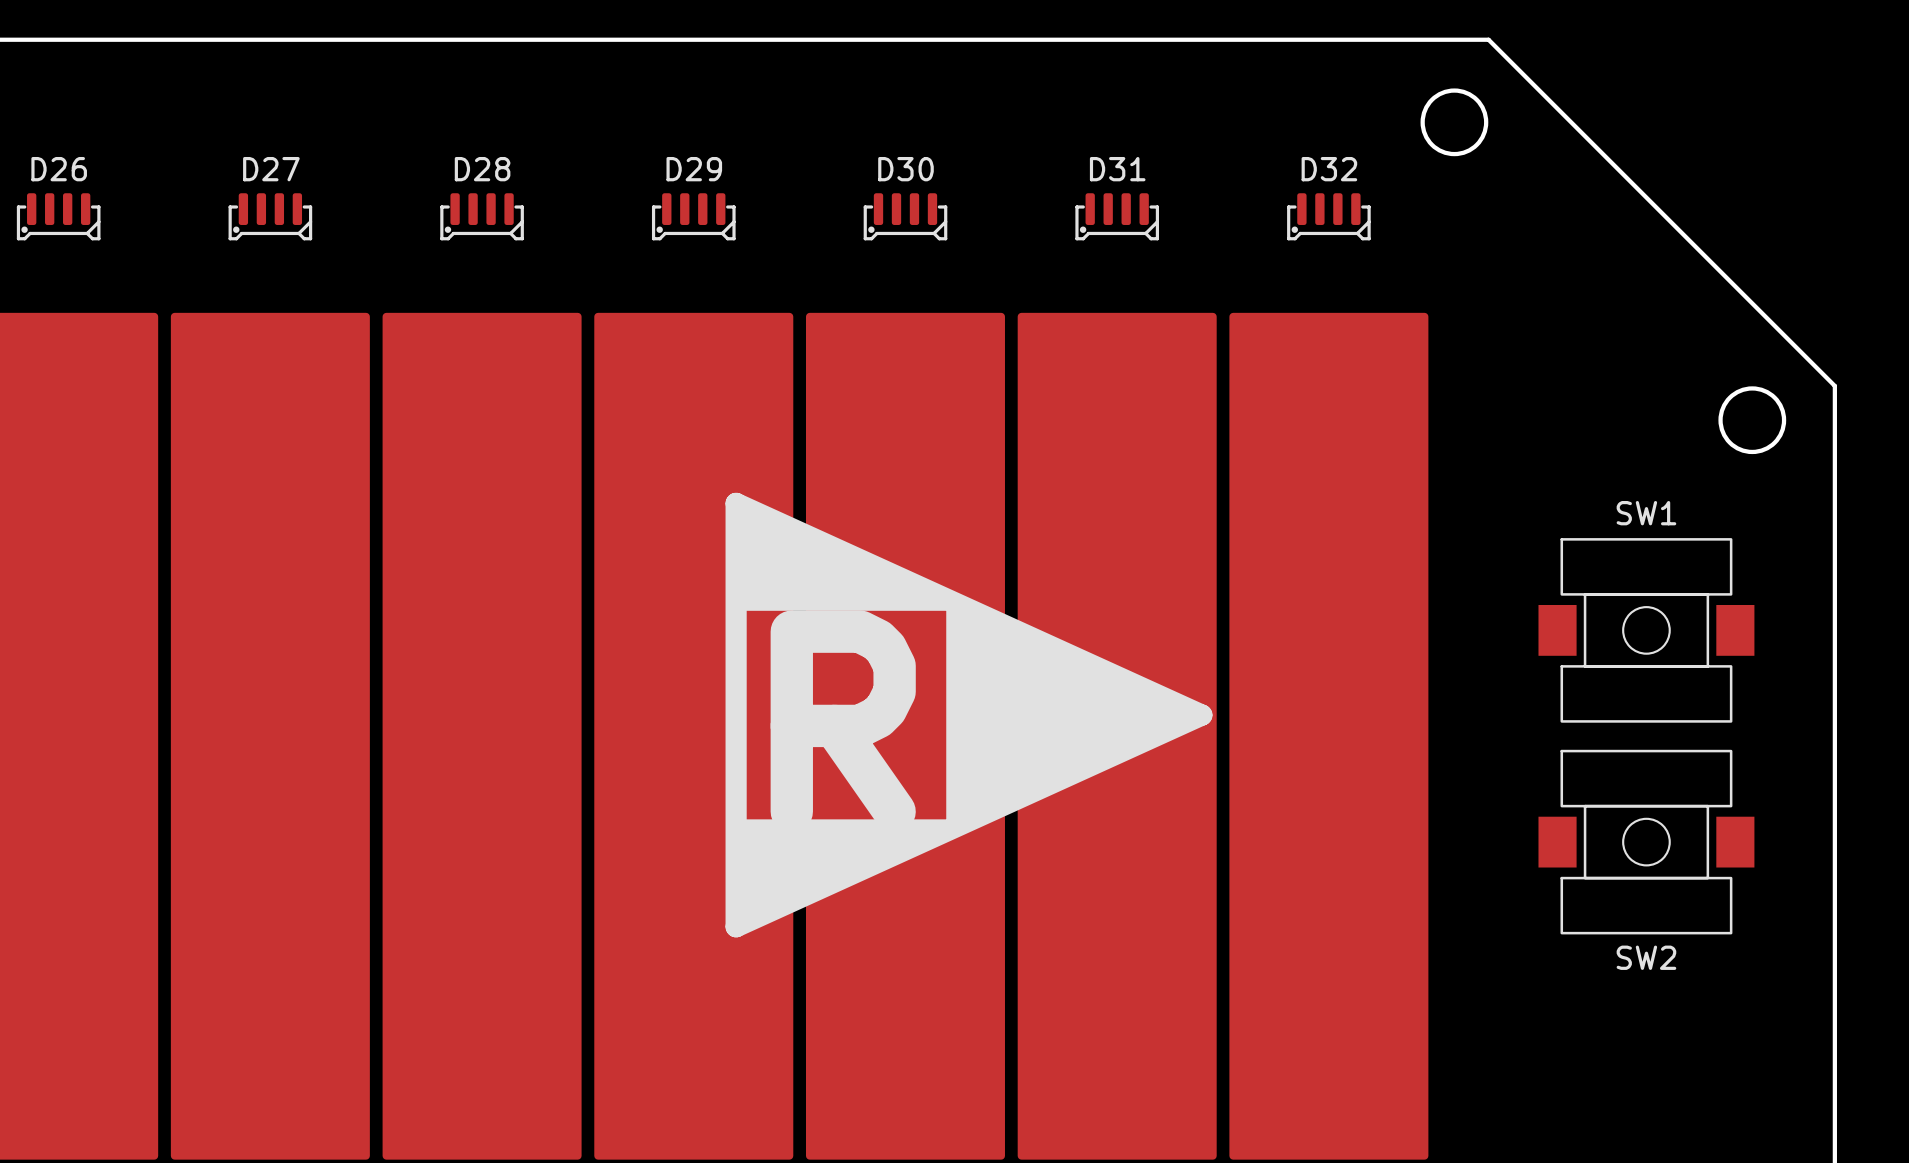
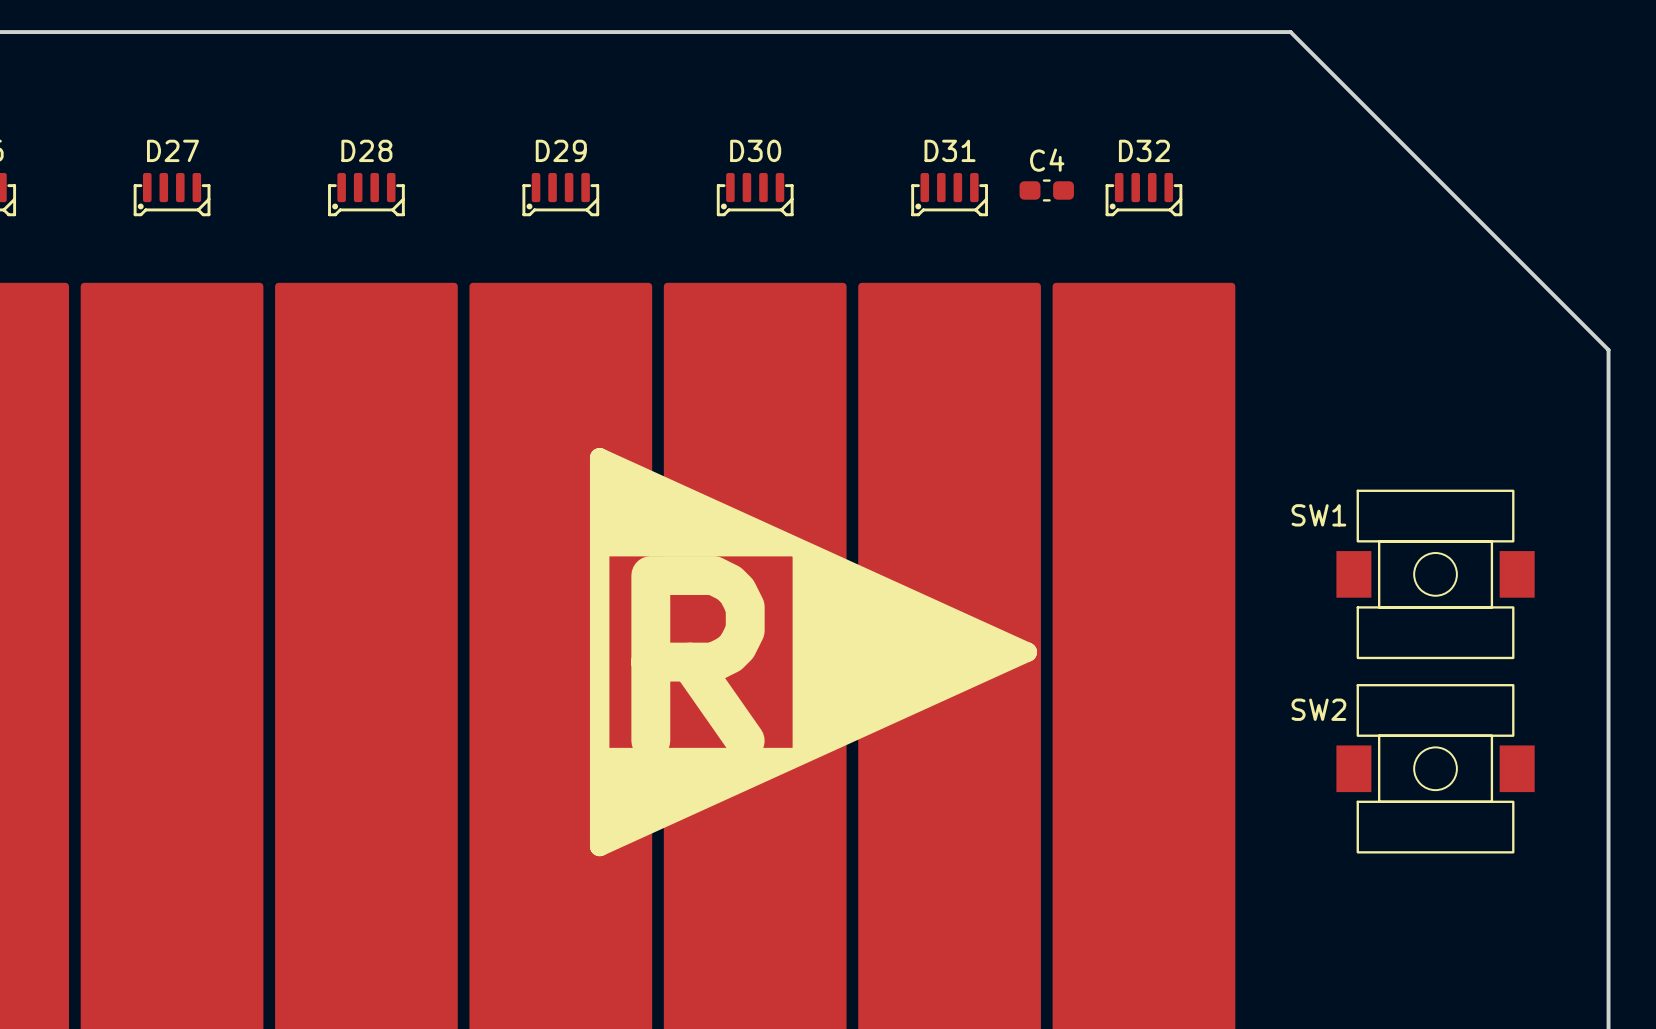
round board edge: [1420, 88, 1489, 157] -> none
C4: none -> (1046, 190)
round board edge: [1718, 386, 1787, 455] -> none
SW1 name position: SW1 (1646, 513) -> SW1 (1318, 515)
SW2 name position: SW2 (1646, 957) -> SW2 (1318, 709)

